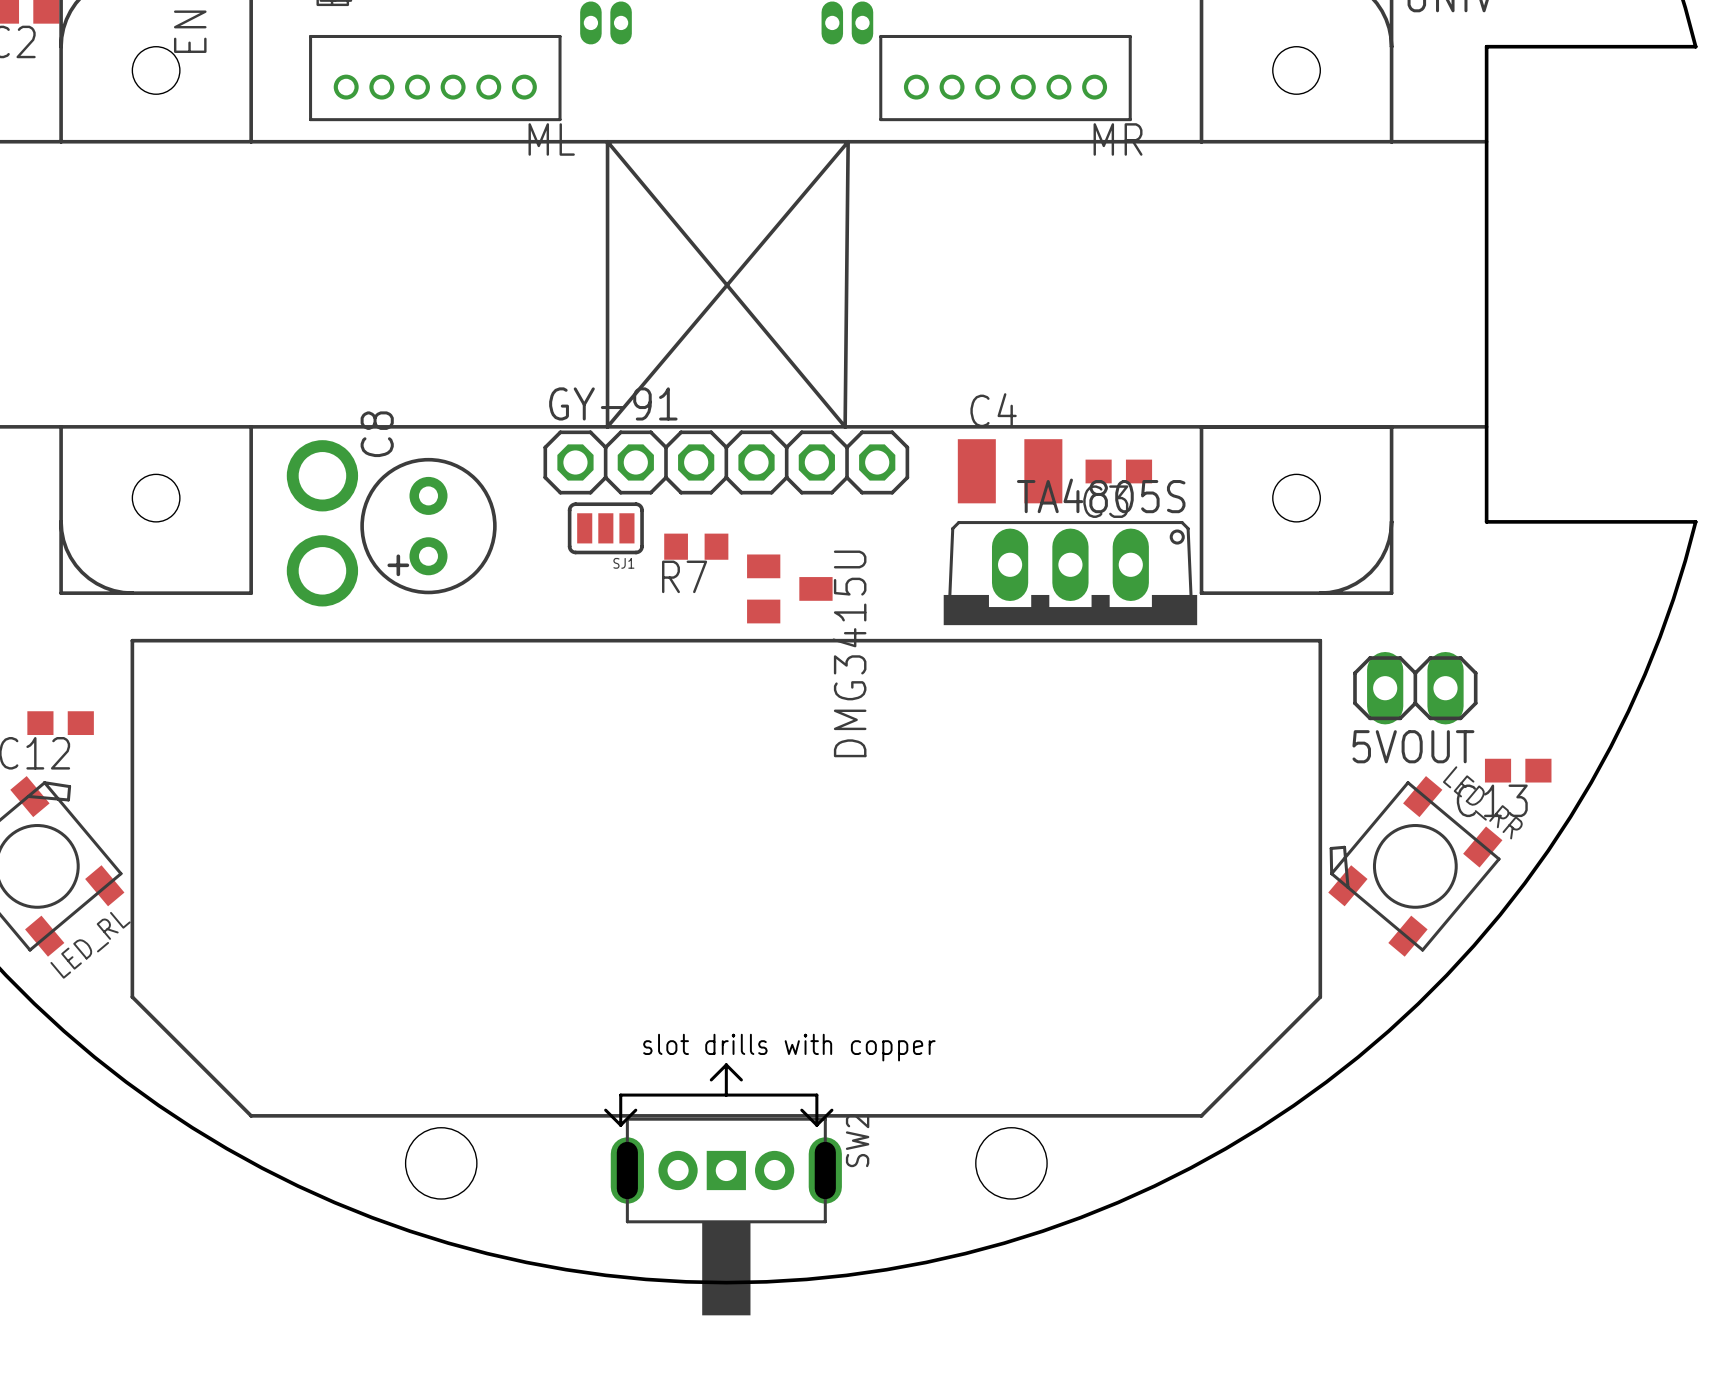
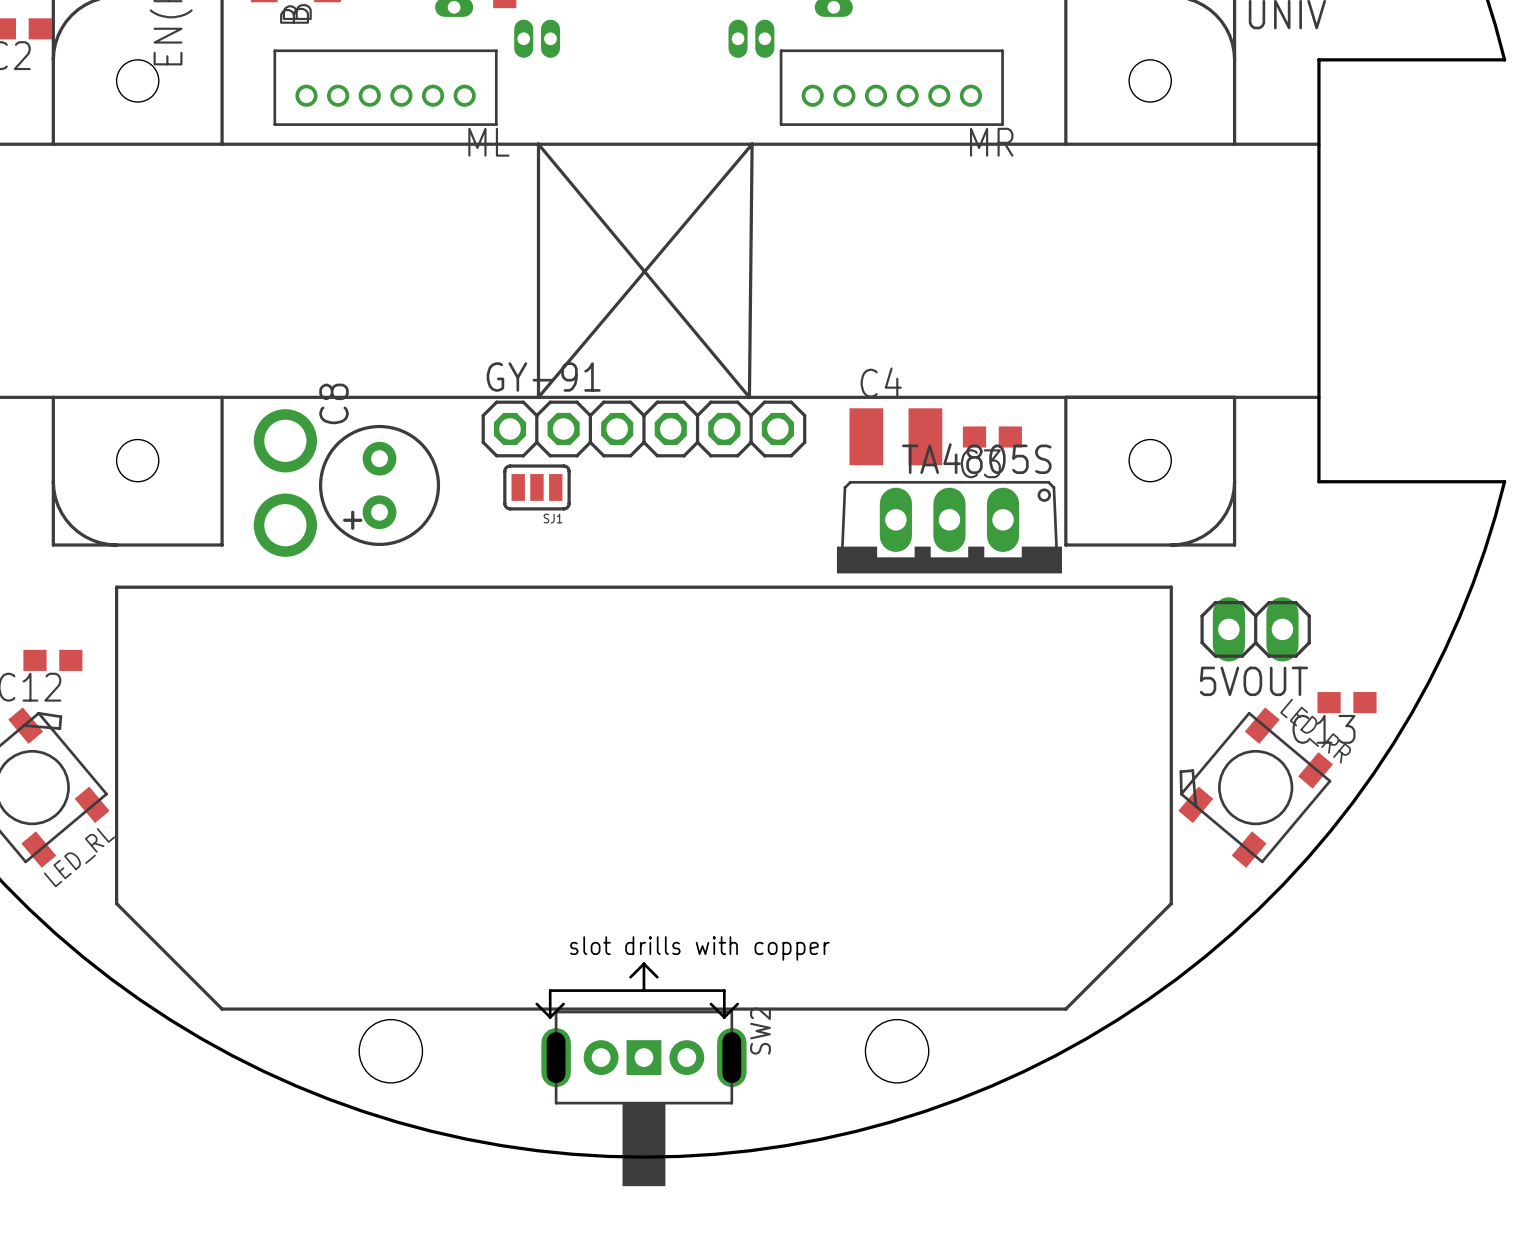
R7: (696, 546) -> none
DMG3415U: (789, 588) -> none

